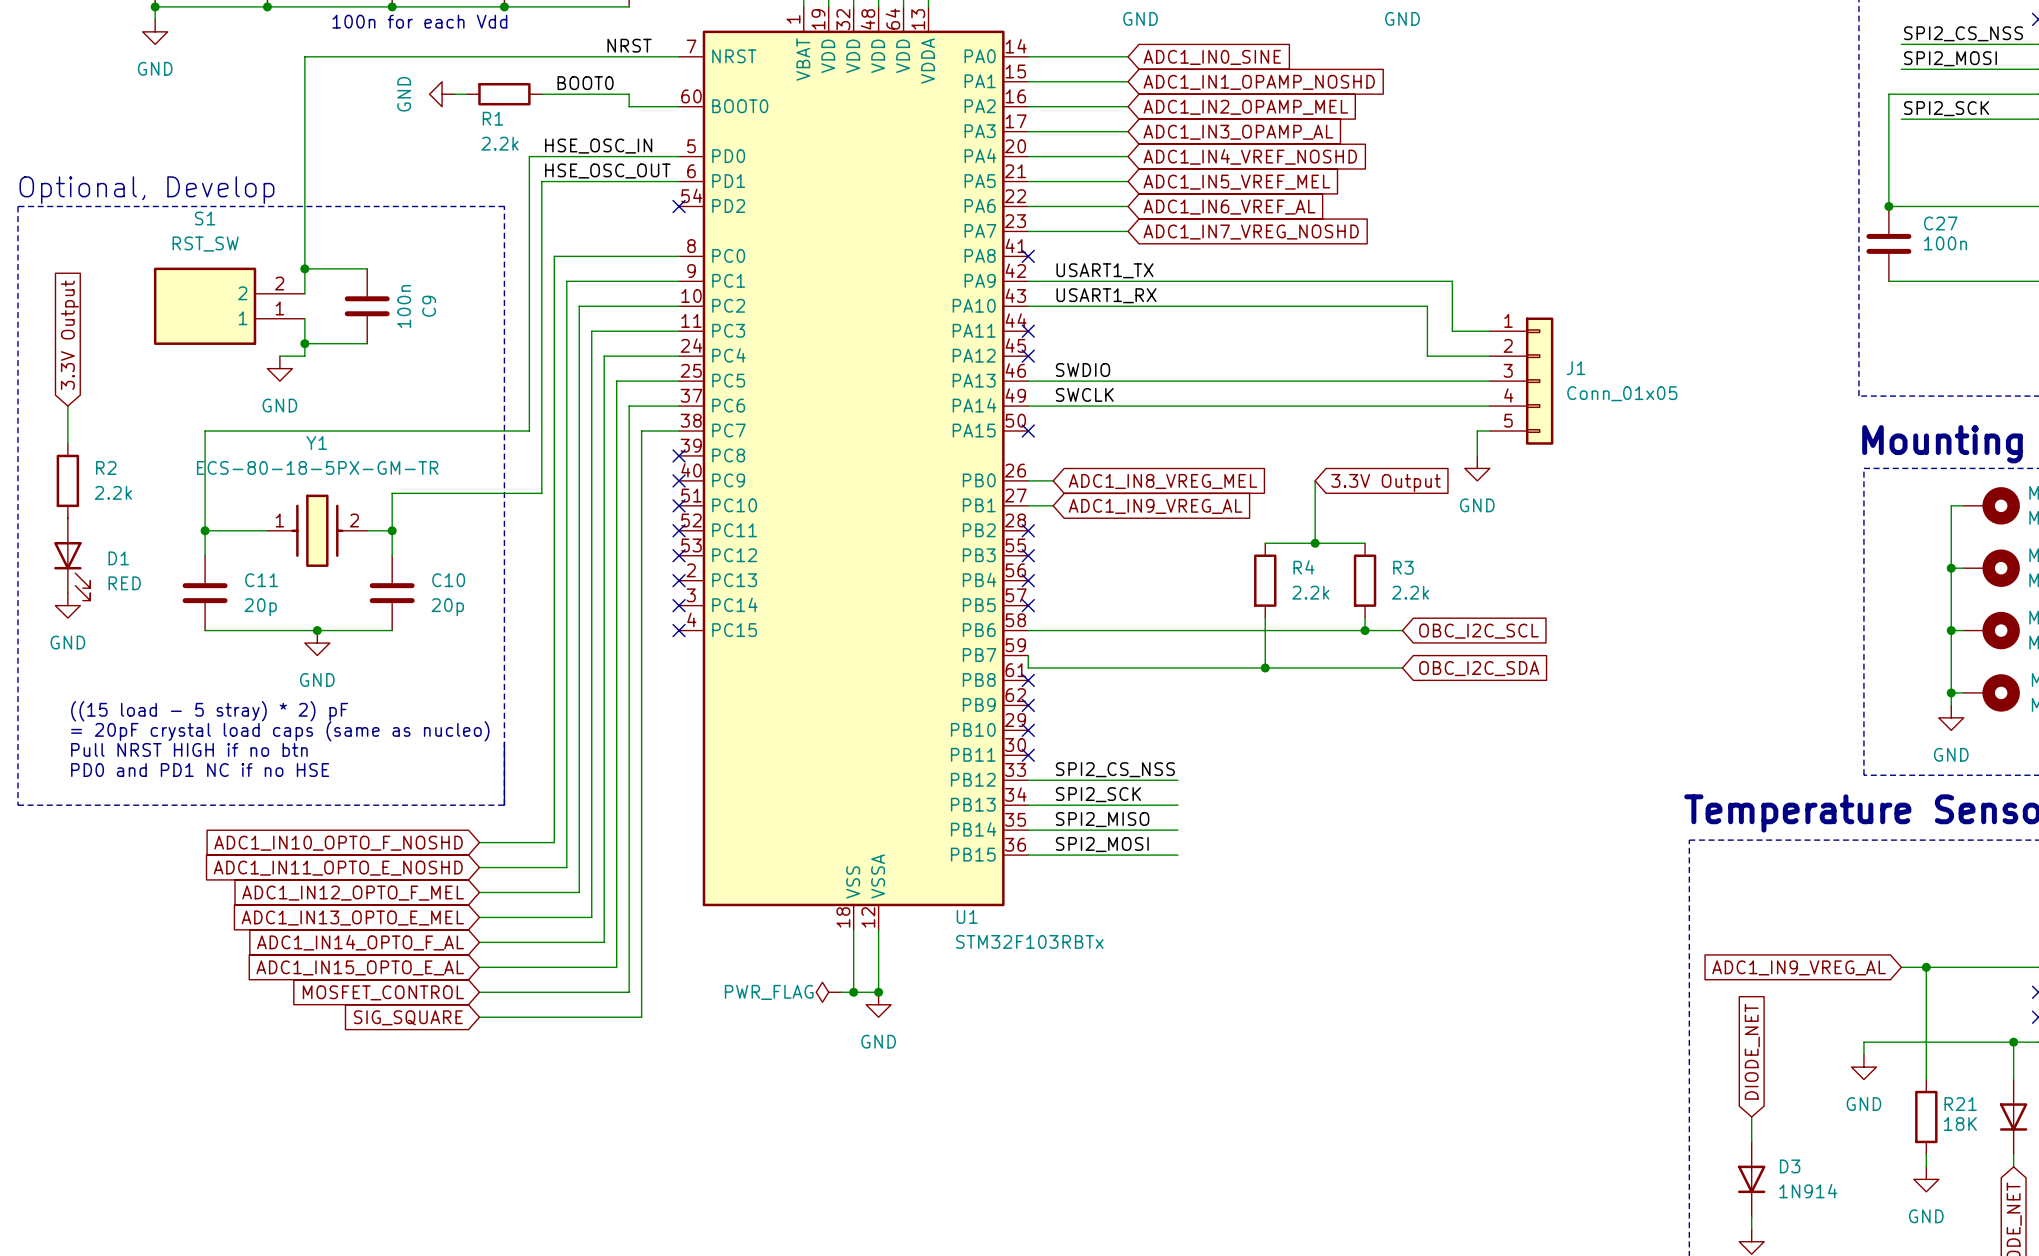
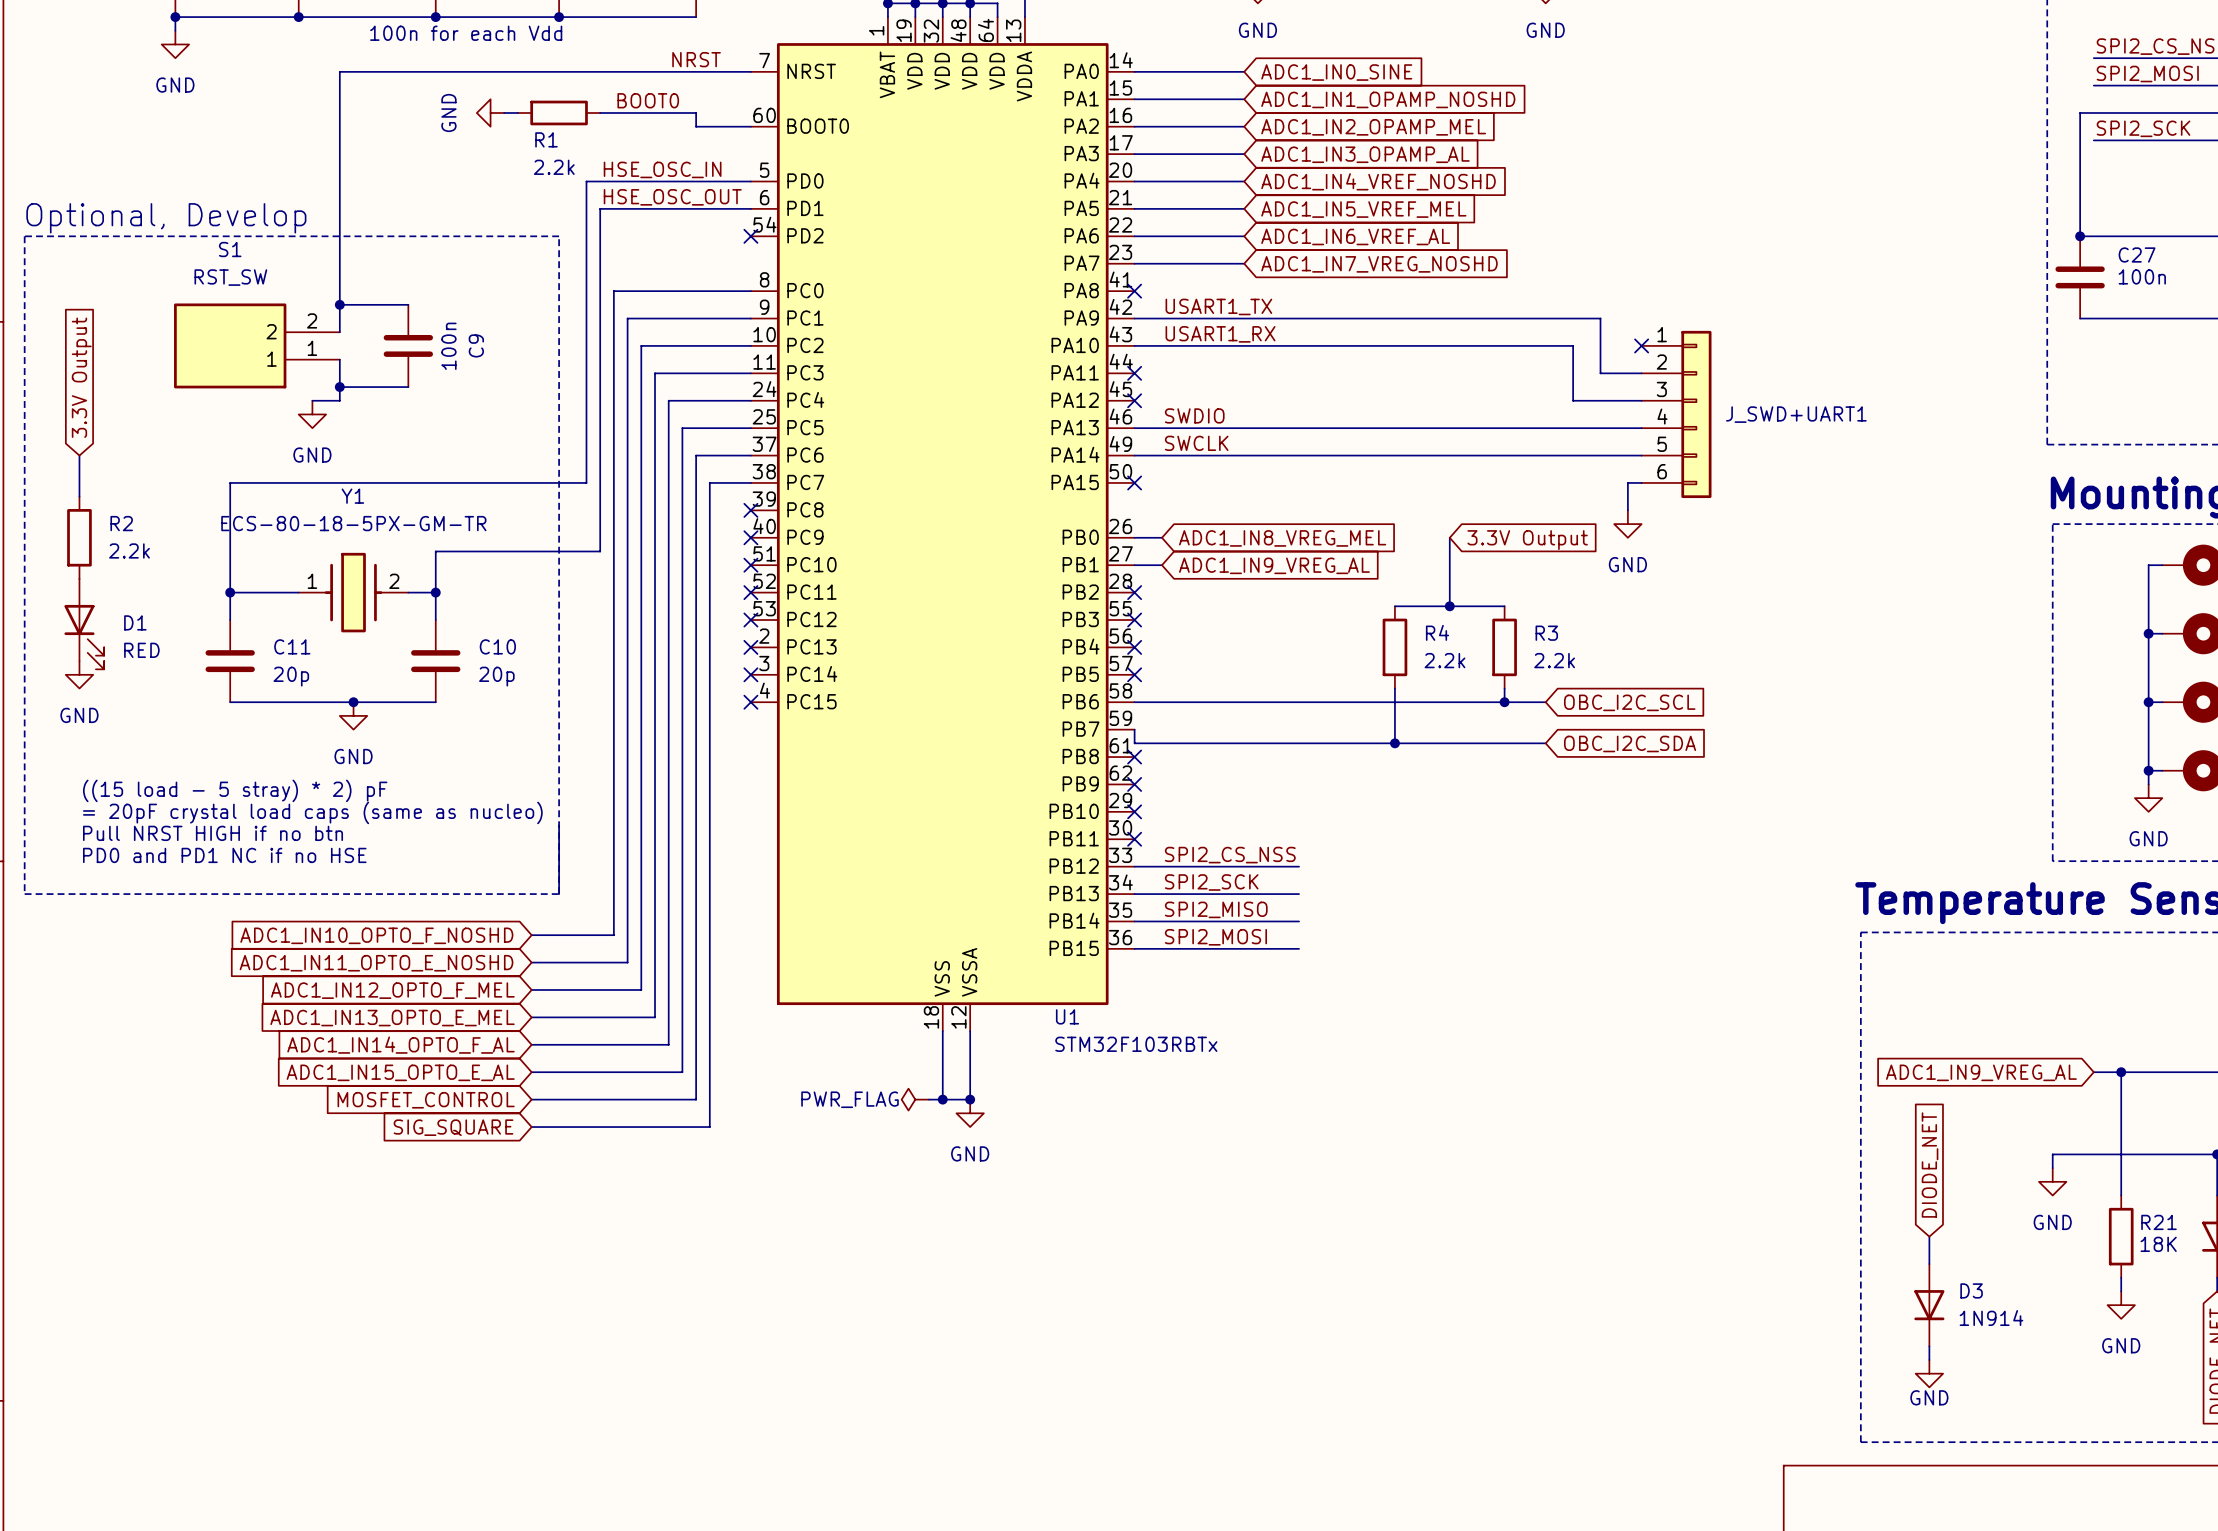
no-connect mark: none -> (1641, 345)
J_SWD+UART1: none -> (1676, 414)
J1: Conn_01x05 (1521, 381) -> none

